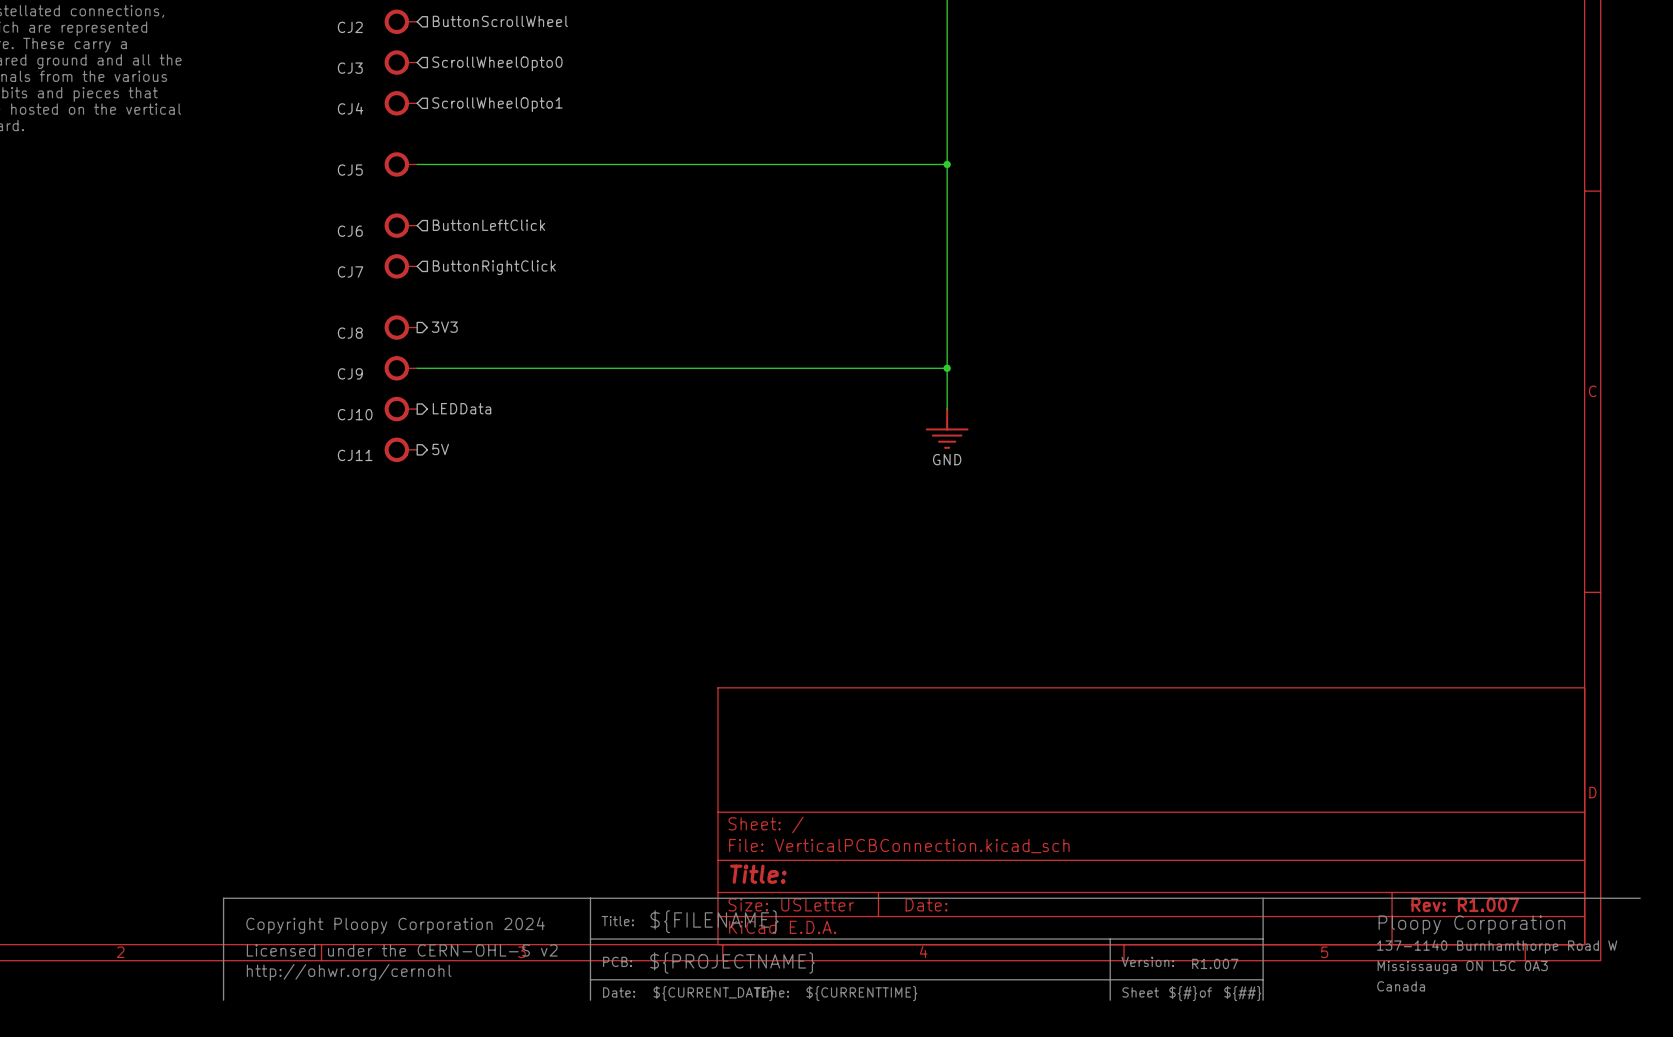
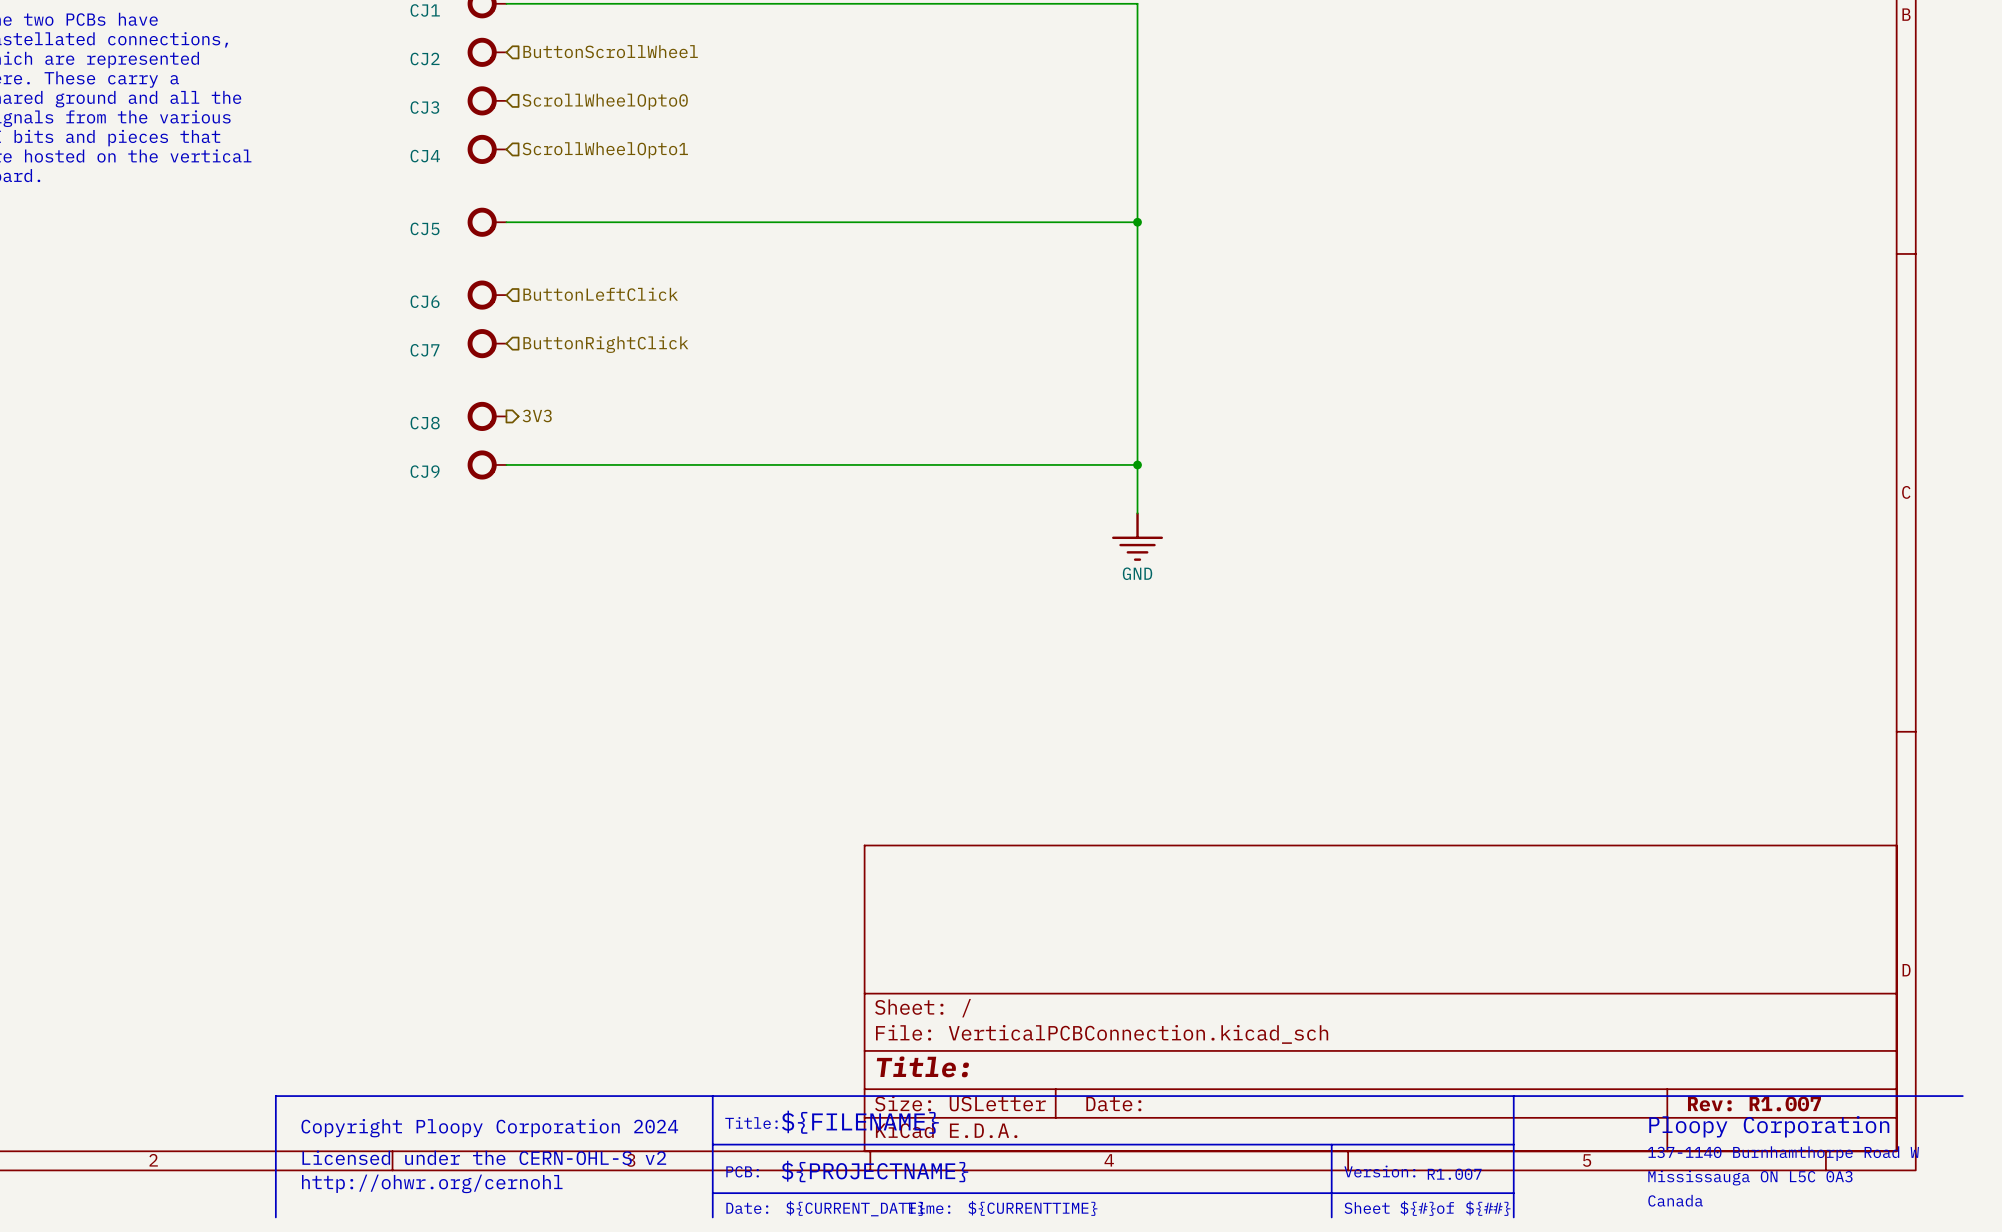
hierarchical label: LEDData (462, 408) -> none
CJ10: (400, 409) -> none
CJ11: (400, 449) -> none
hierarchical label: 5V (440, 449) -> none

